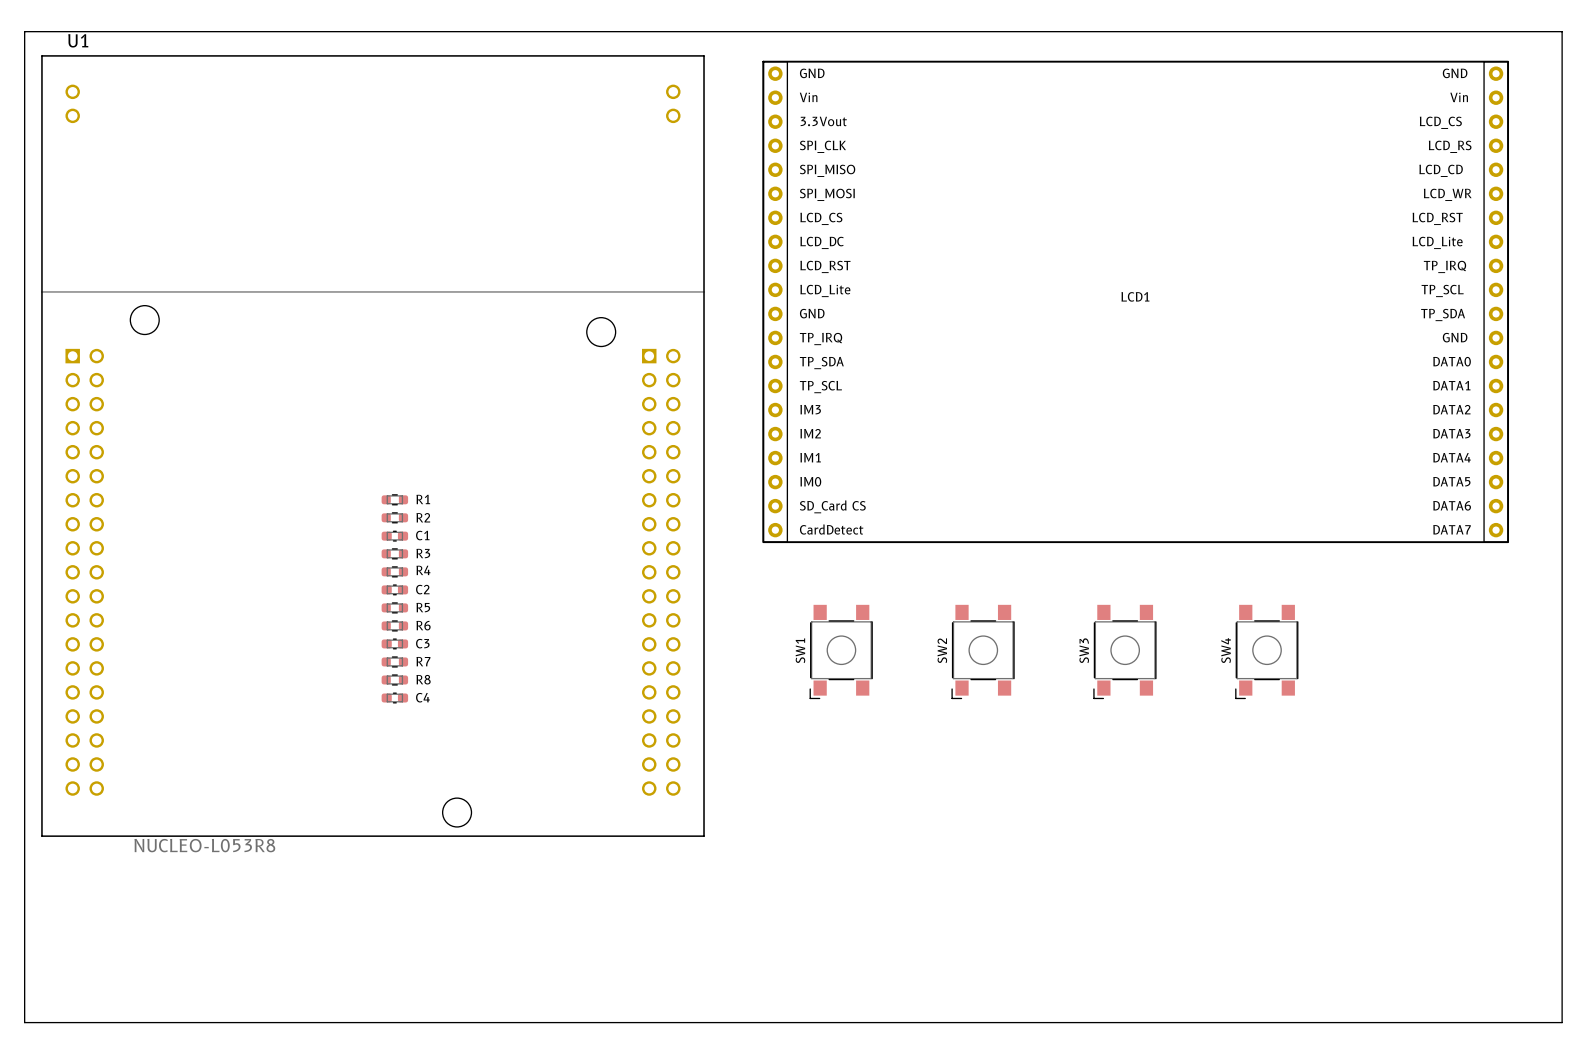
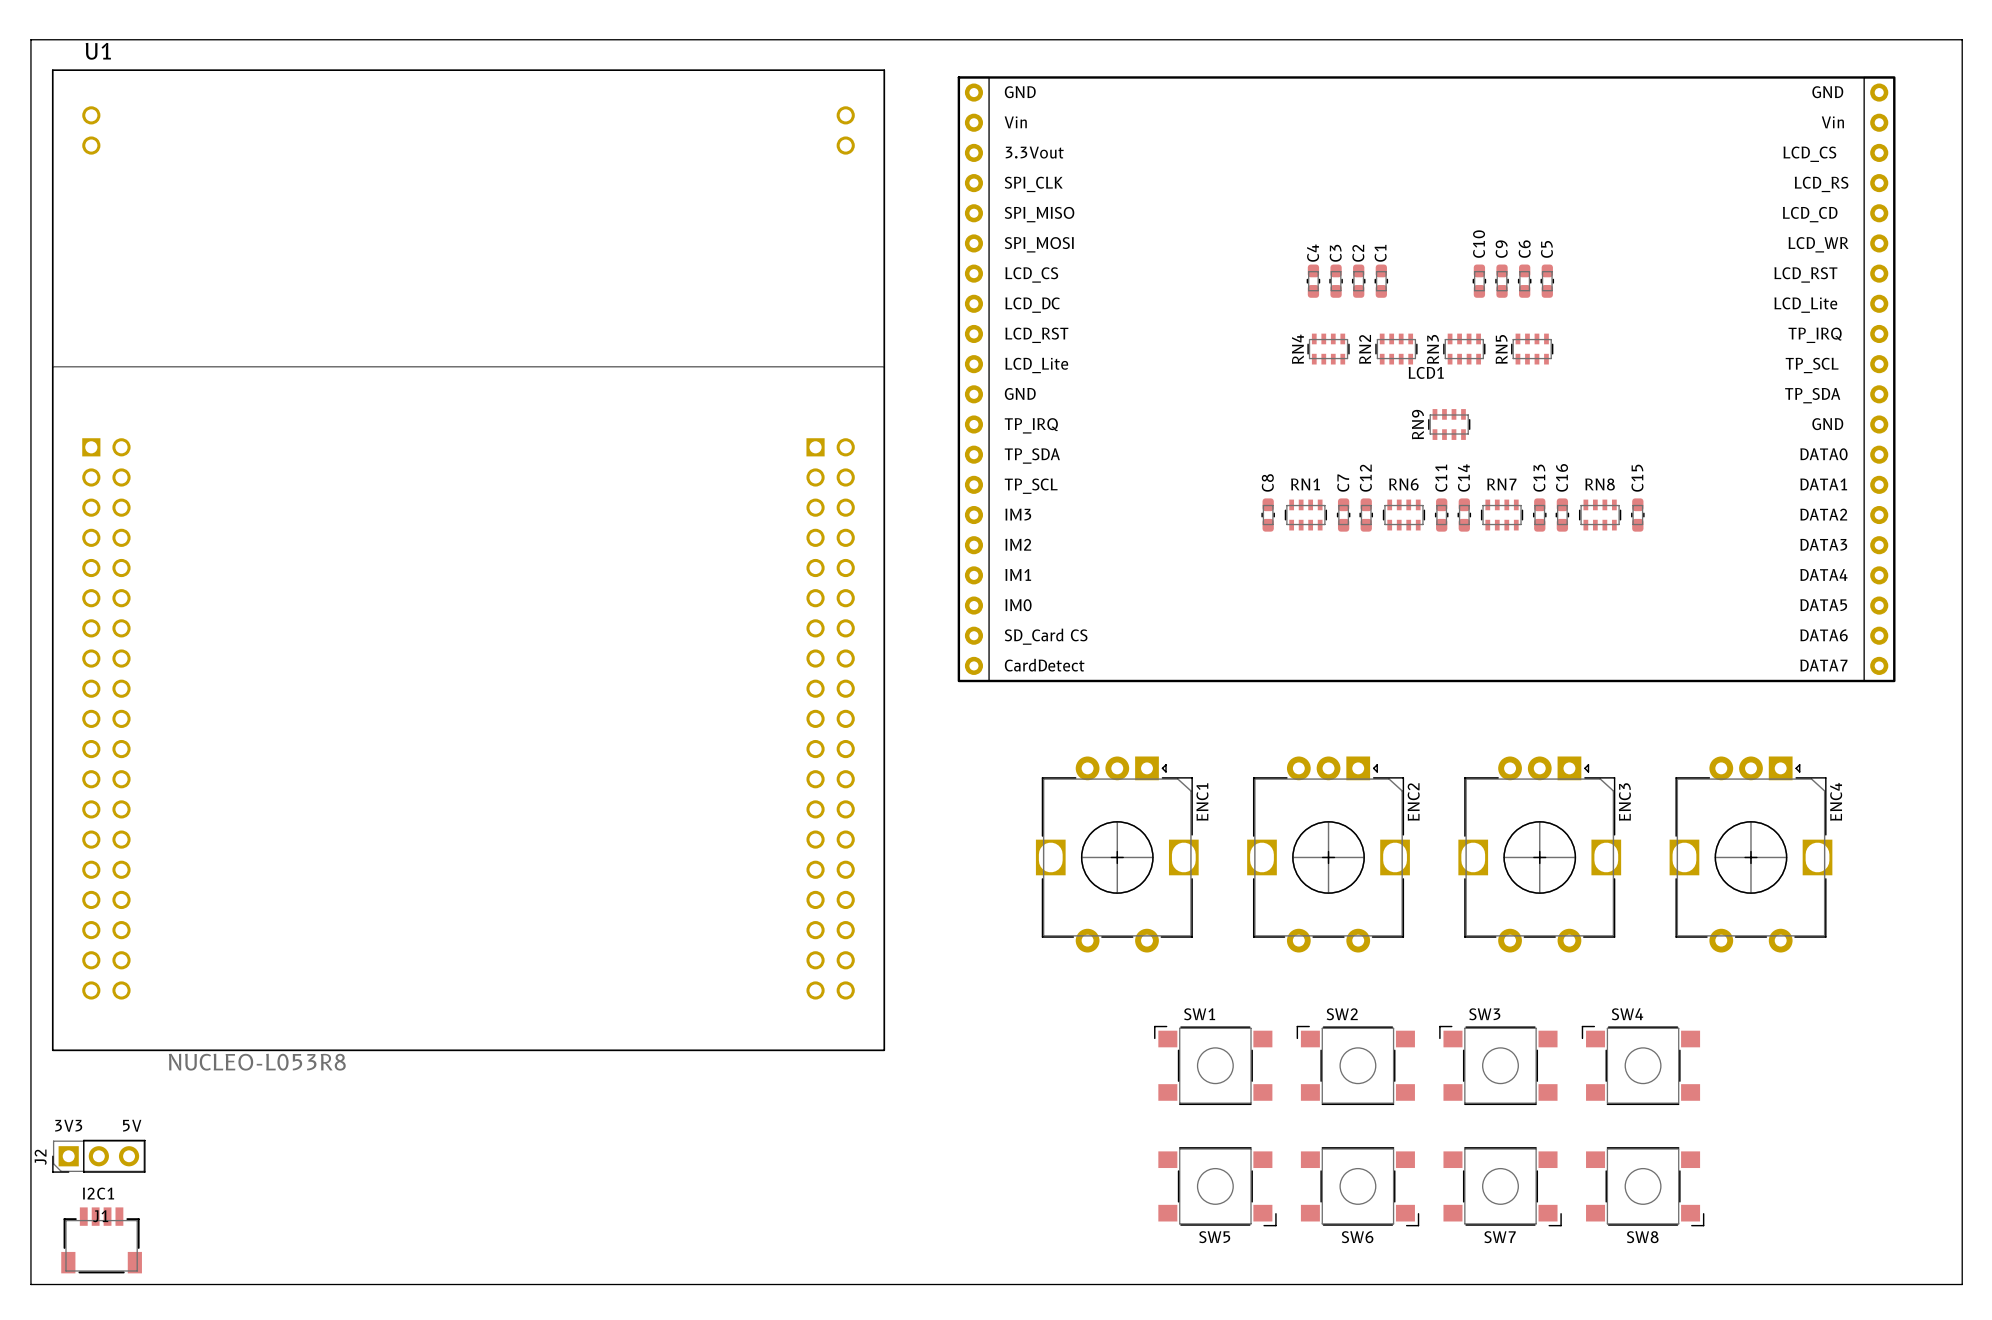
U1 footprint: [41, 55, 705, 837] -> [51, 69, 886, 1052]
C10: none -> (1479, 281)
C9: none -> (1502, 281)
C6: none -> (1524, 281)
C5: none -> (1547, 281)
RN4: none -> (1328, 349)
RN2: none -> (1396, 349)
RN3: none -> (1464, 349)
RN5: none -> (1532, 349)
RN9: none -> (1449, 424)
C8: none -> (1268, 515)
RN1: none -> (1305, 515)
C7: none -> (1343, 515)
C12: none -> (1366, 515)
RN6: none -> (1403, 515)
C11: none -> (1441, 515)
C14: none -> (1464, 515)
RN7: none -> (1502, 515)
C13: none -> (1539, 515)
C16: none -> (1562, 515)
RN8: none -> (1600, 515)
C15: none -> (1637, 515)
R1: (394, 499) -> none
R2: (394, 517) -> none
C1 name position: C1 (422, 535) -> C1 (1380, 253)
C1 rotation: 0° (394, 536) -> 90° clockwise (1381, 281)
C1 position: (394, 536) -> (1381, 281)
R3: (394, 553) -> none
R4: (394, 571) -> none
C2 rotation: 0° (394, 589) -> 90° clockwise (1358, 281)
C2 position: (394, 589) -> (1358, 281)
C2 name position: C2 (422, 589) -> C2 (1358, 253)
R5: (394, 607) -> none
R6: (394, 625) -> none
C3 rotation: 0° (394, 643) -> 90° clockwise (1336, 281)
C3 position: (394, 643) -> (1336, 281)
C3 name position: C3 (422, 643) -> C3 (1335, 253)
SW1 rotation: 0° (841, 651) -> 90° clockwise (1213, 1065)
SW1 position: (841, 651) -> (1213, 1065)
SW2 rotation: 0° (983, 651) -> 90° clockwise (1355, 1065)
SW2 position: (983, 651) -> (1355, 1065)
SW3 rotation: 0° (1124, 651) -> 90° clockwise (1498, 1065)
SW3 position: (1124, 651) -> (1498, 1065)
SW4 rotation: 0° (1266, 651) -> 90° clockwise (1640, 1065)
SW4 position: (1266, 651) -> (1640, 1065)
R7: (394, 661) -> none
R8: (394, 679) -> none
ENC1: none -> (1117, 854)
ENC2: none -> (1328, 854)
ENC3: none -> (1539, 854)
ENC4: none -> (1750, 854)
C4 name position: C4 (422, 697) -> C4 (1313, 253)
C4 rotation: 0° (394, 698) -> 90° clockwise (1313, 281)
C4 position: (394, 698) -> (1313, 281)
text: none -> 3V3 (68, 1125)
text: none -> 5V (132, 1125)
J2: none -> (98, 1156)
SW5: none -> (1217, 1186)
SW6: none -> (1360, 1186)
SW7: none -> (1502, 1186)
SW8: none -> (1645, 1186)
text: none -> I2C1 (98, 1193)
J1: none -> (101, 1240)

